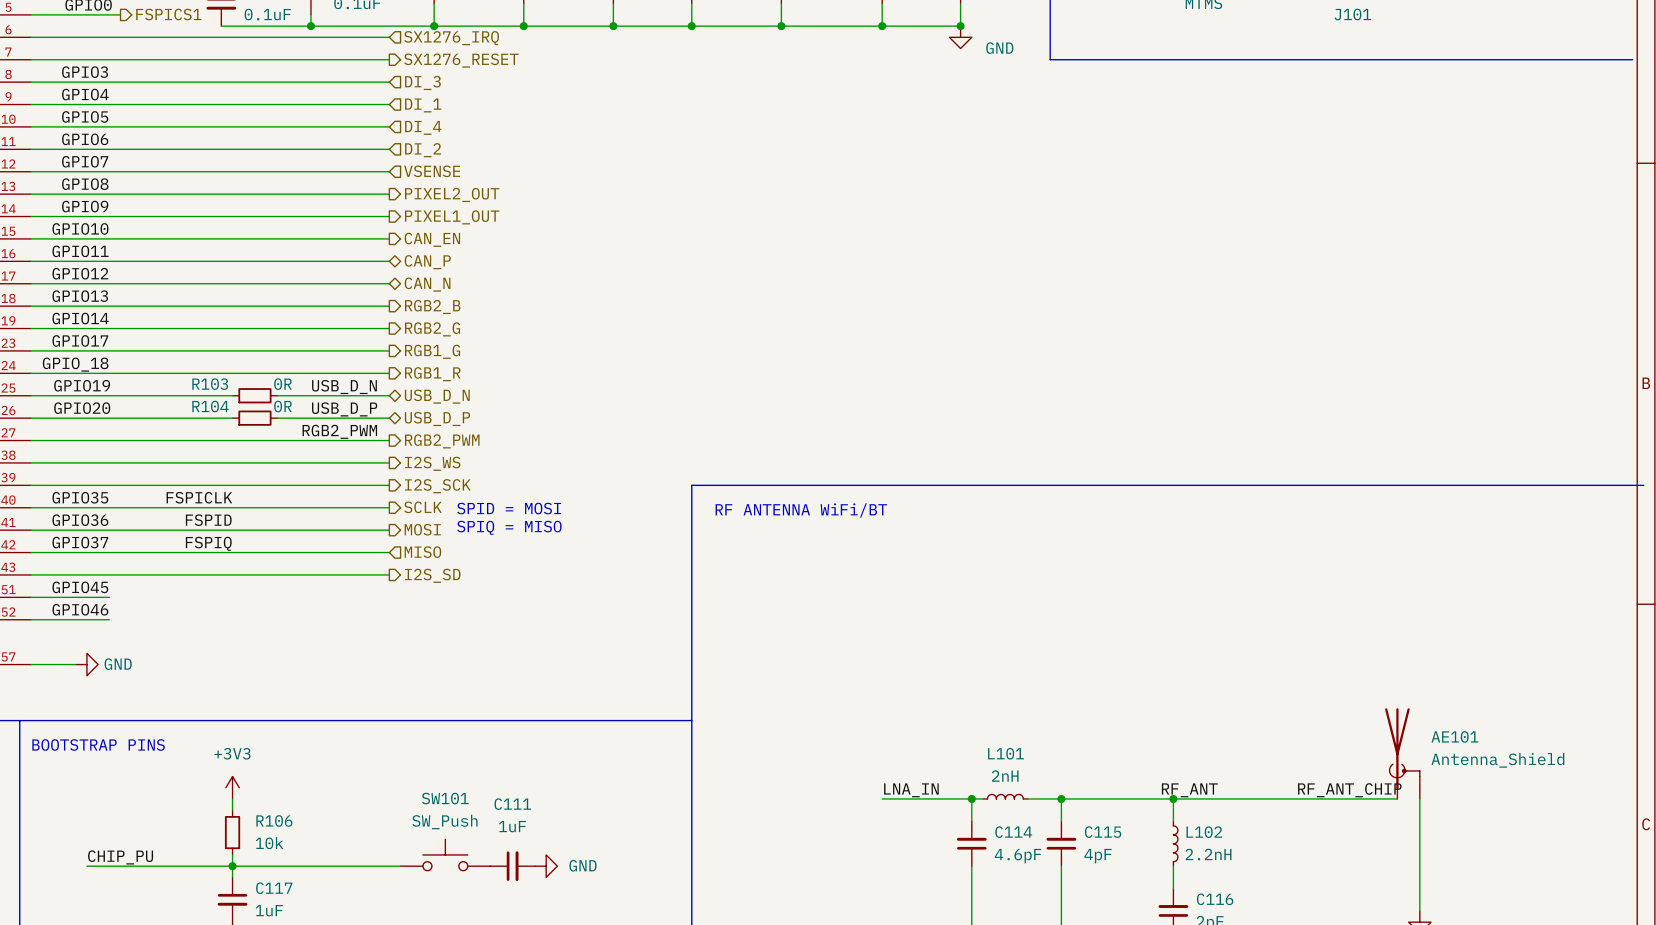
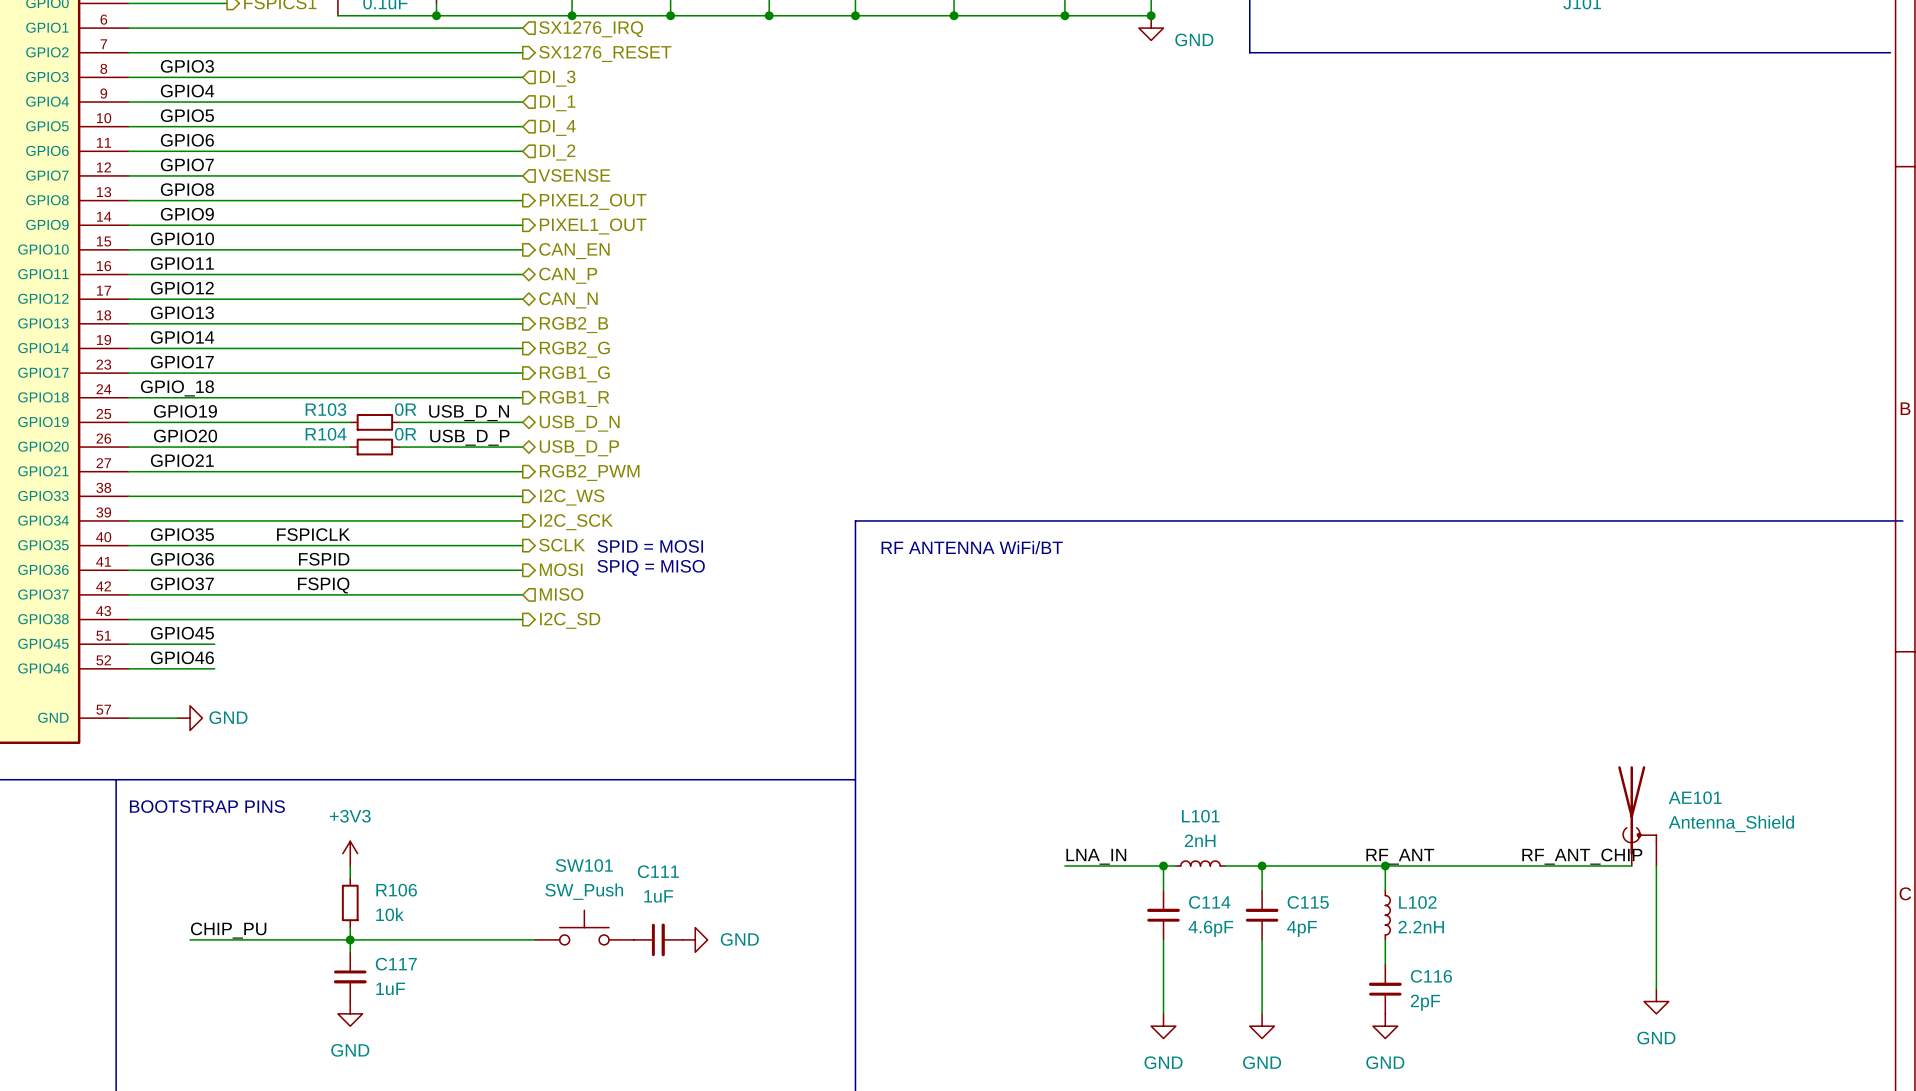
label: none -> GPIO21 (182, 460)
label: RGB2_PWM (339, 431) -> none
hierarchical label: I2S_WS (432, 463) -> I2C_WS (572, 497)
hierarchical label: I2S_SCK (437, 486) -> I2C_SCK (576, 522)
hierarchical label: I2S_SD (432, 575) -> I2C_SD (570, 620)

